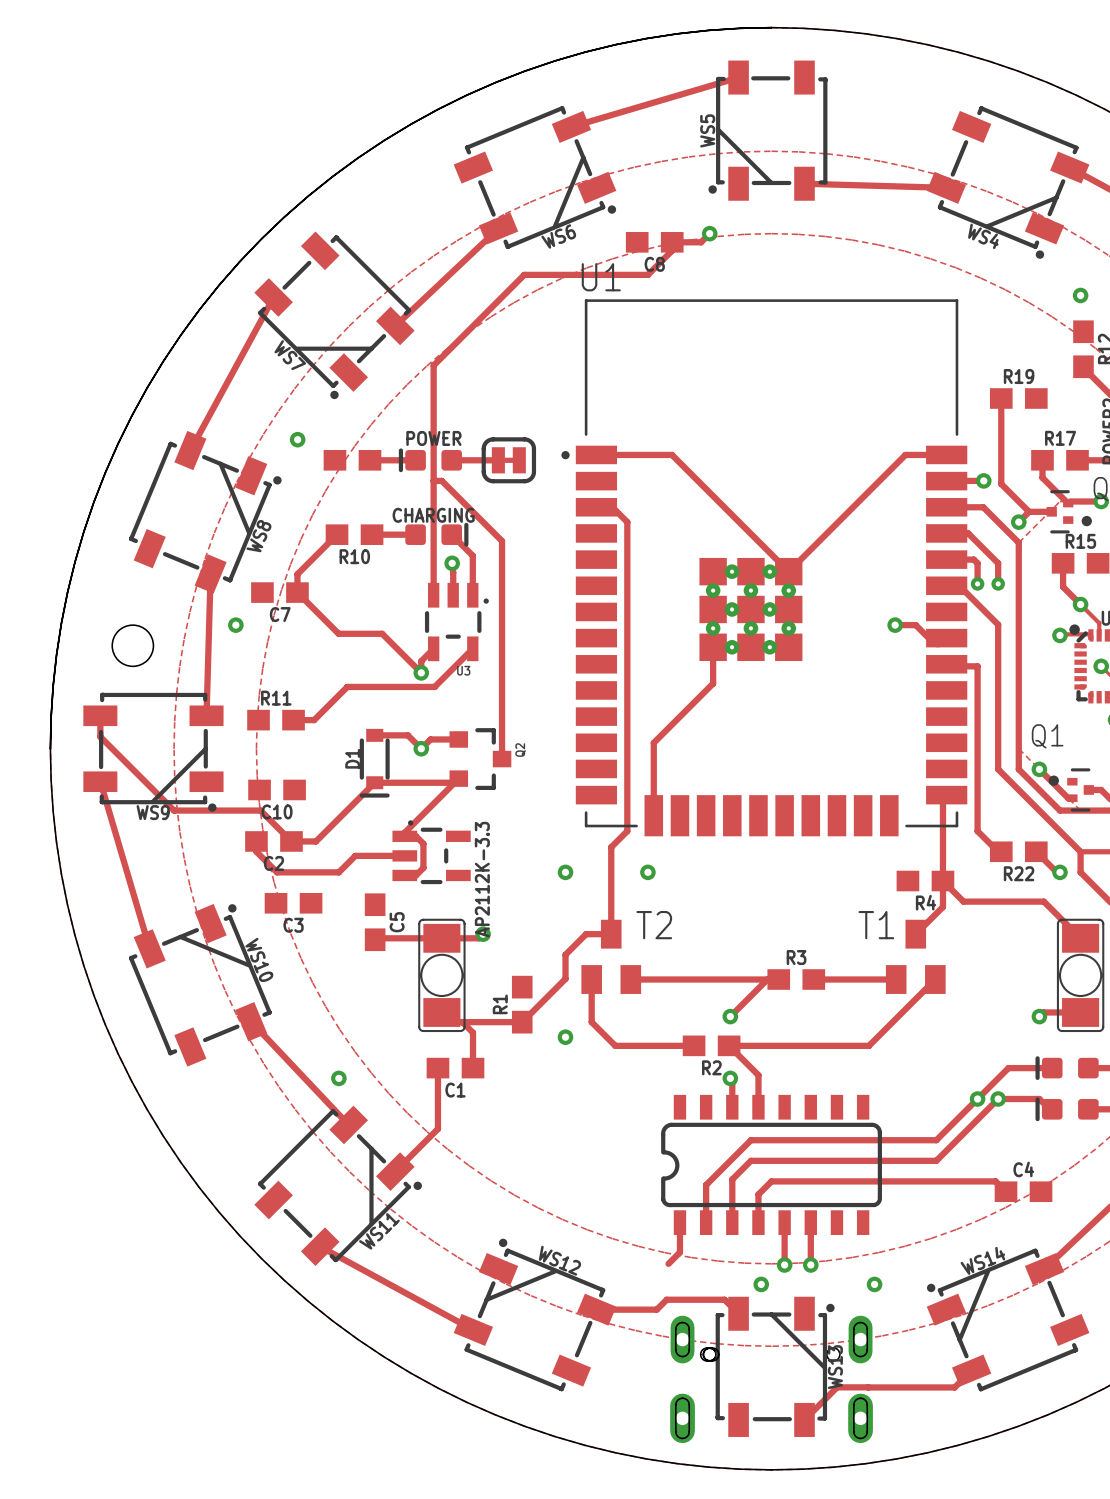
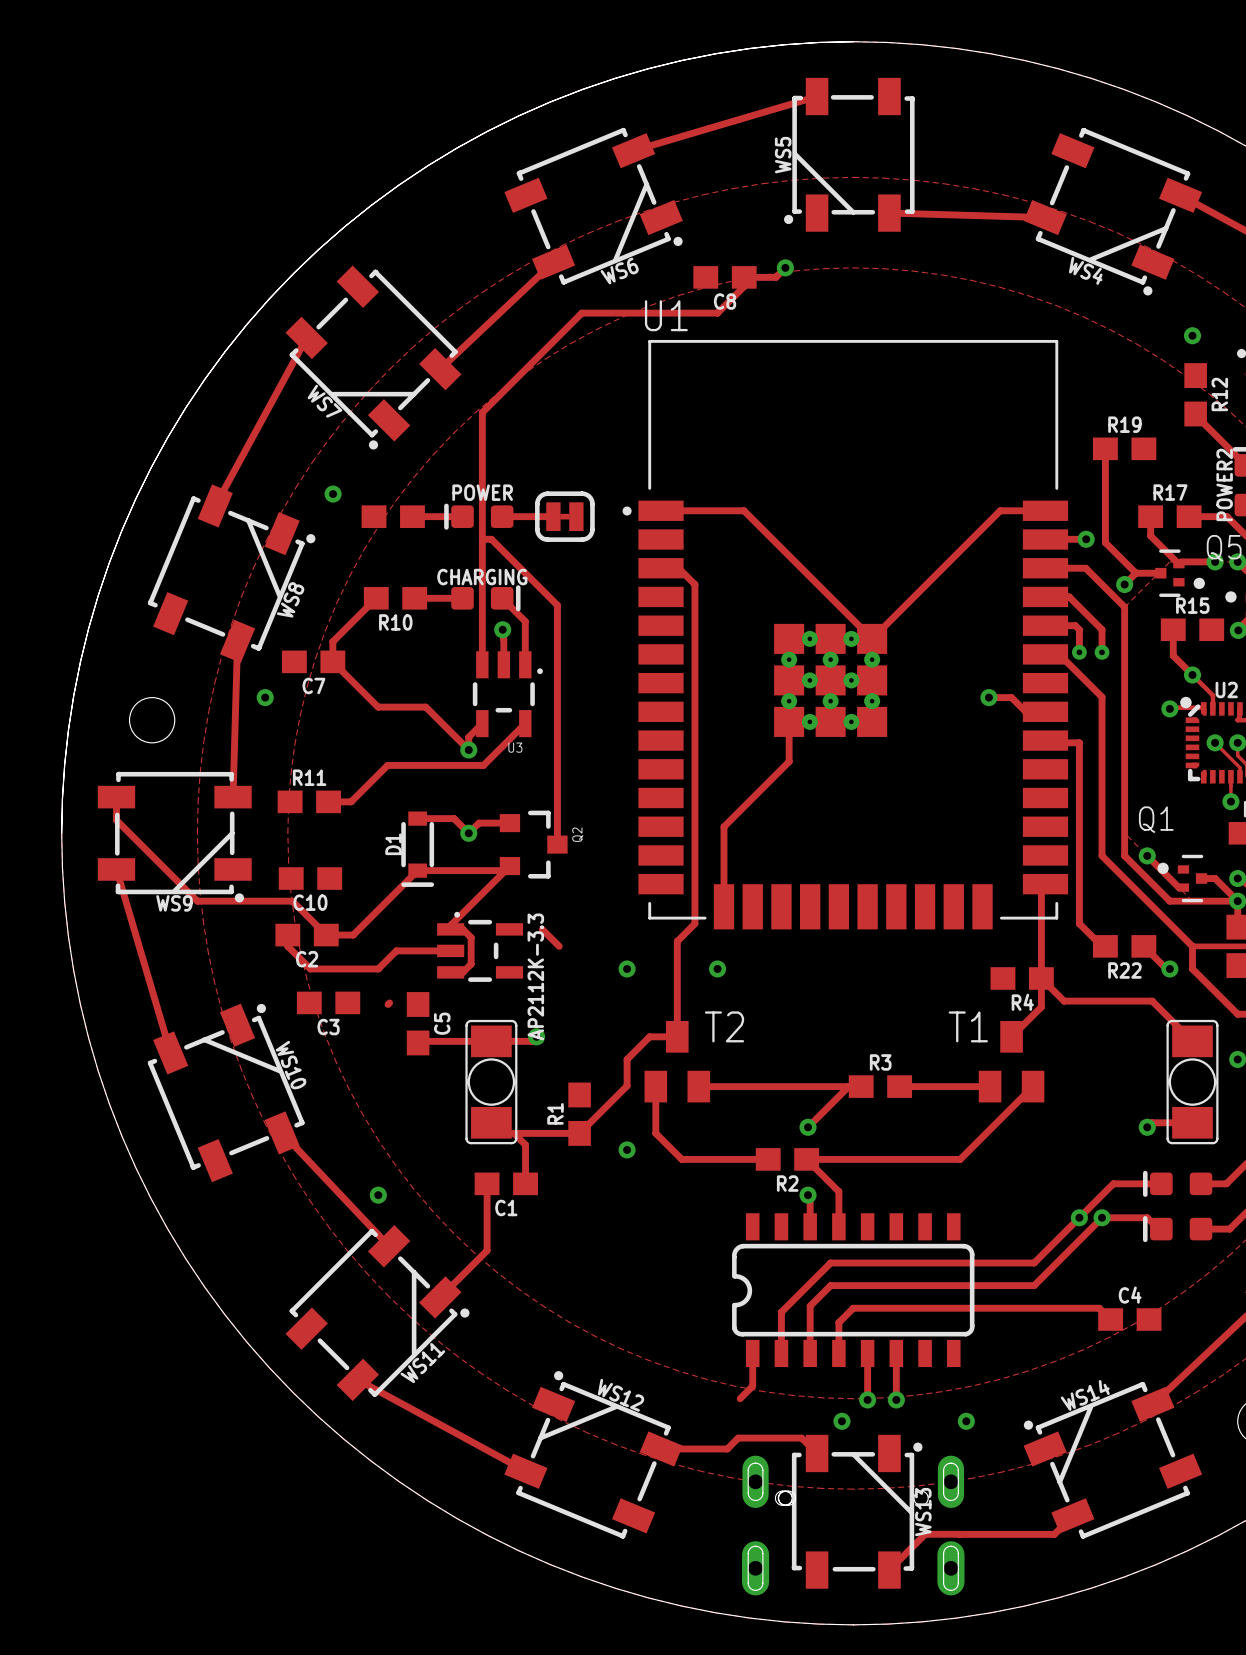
track: none -> (542, 929) (559, 946)
track: none -> (389, 1002) (388, 1004)

